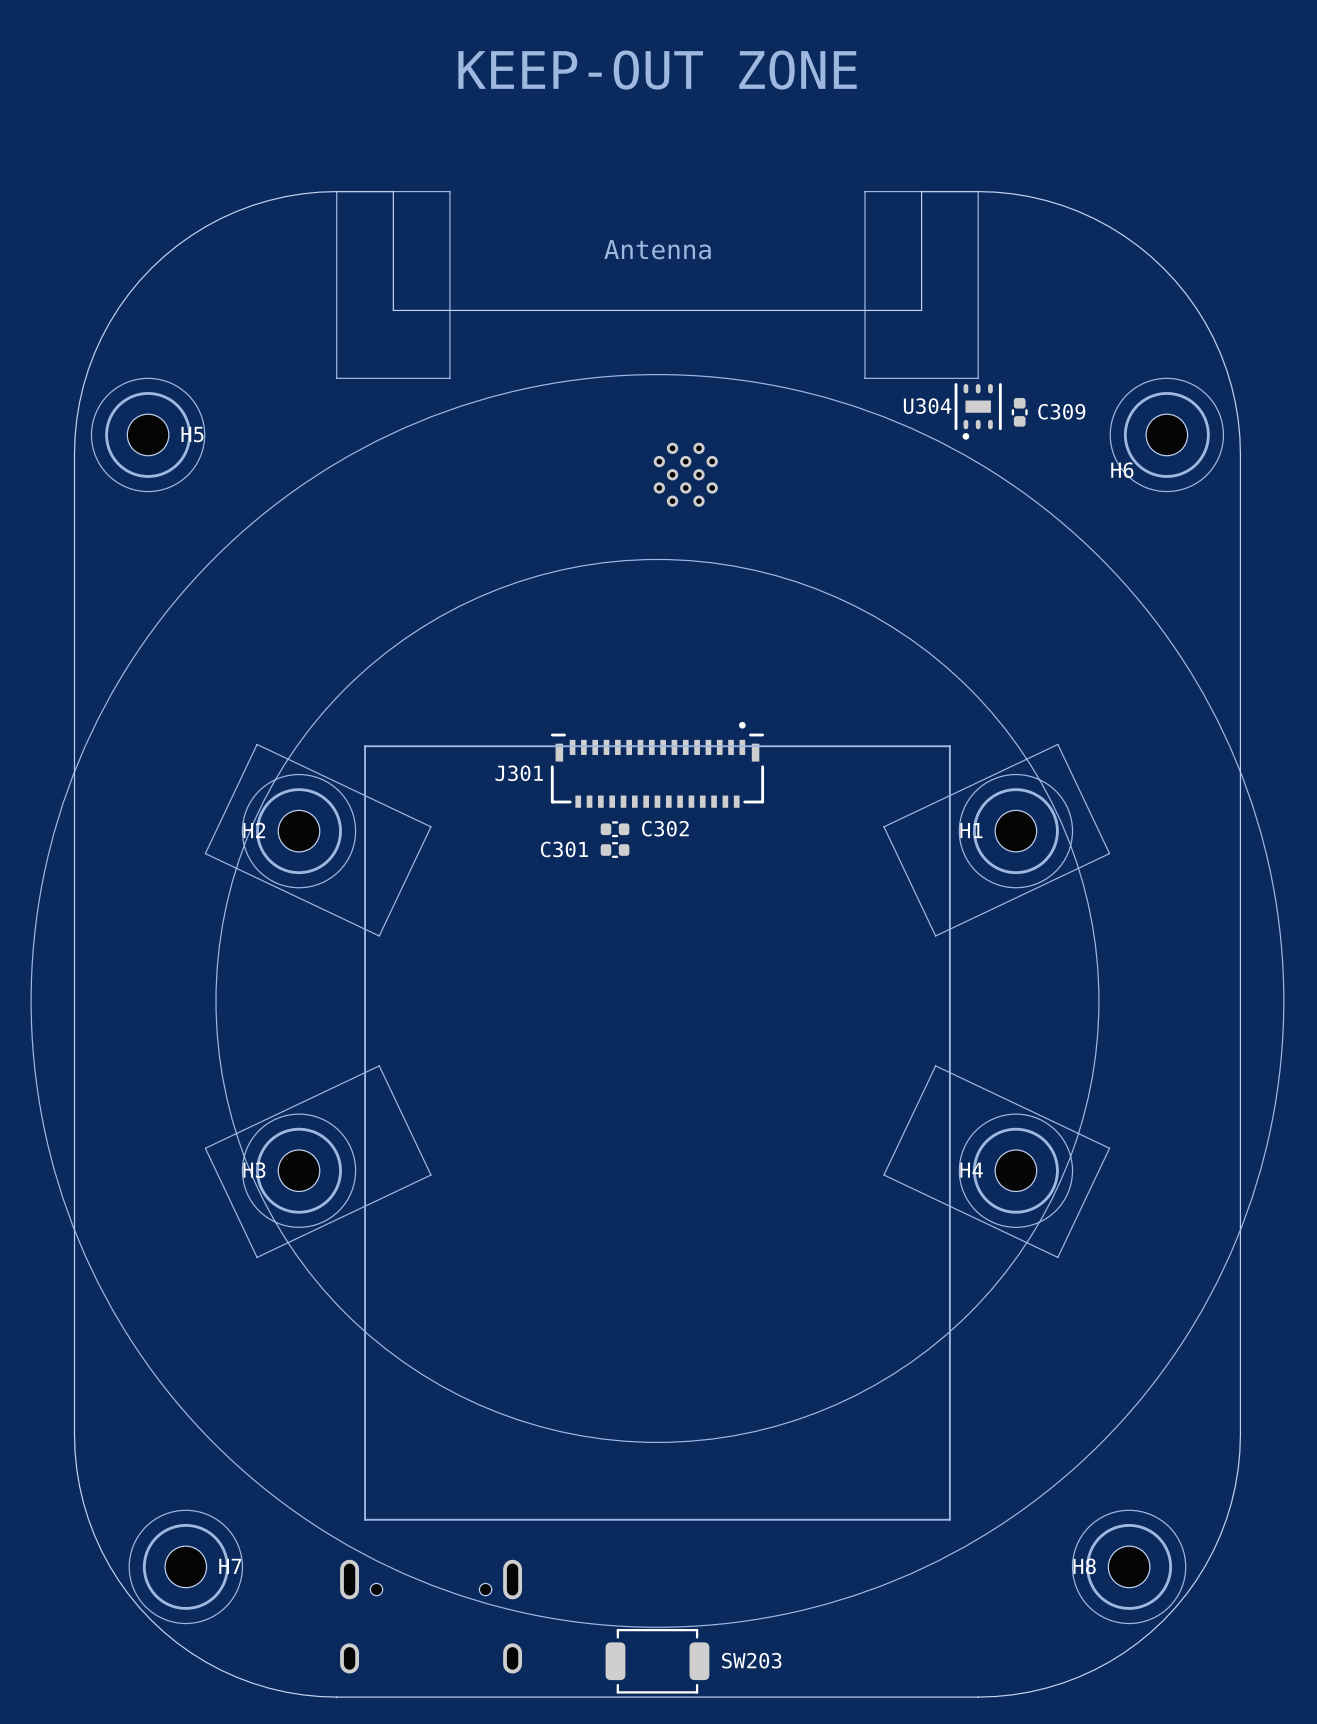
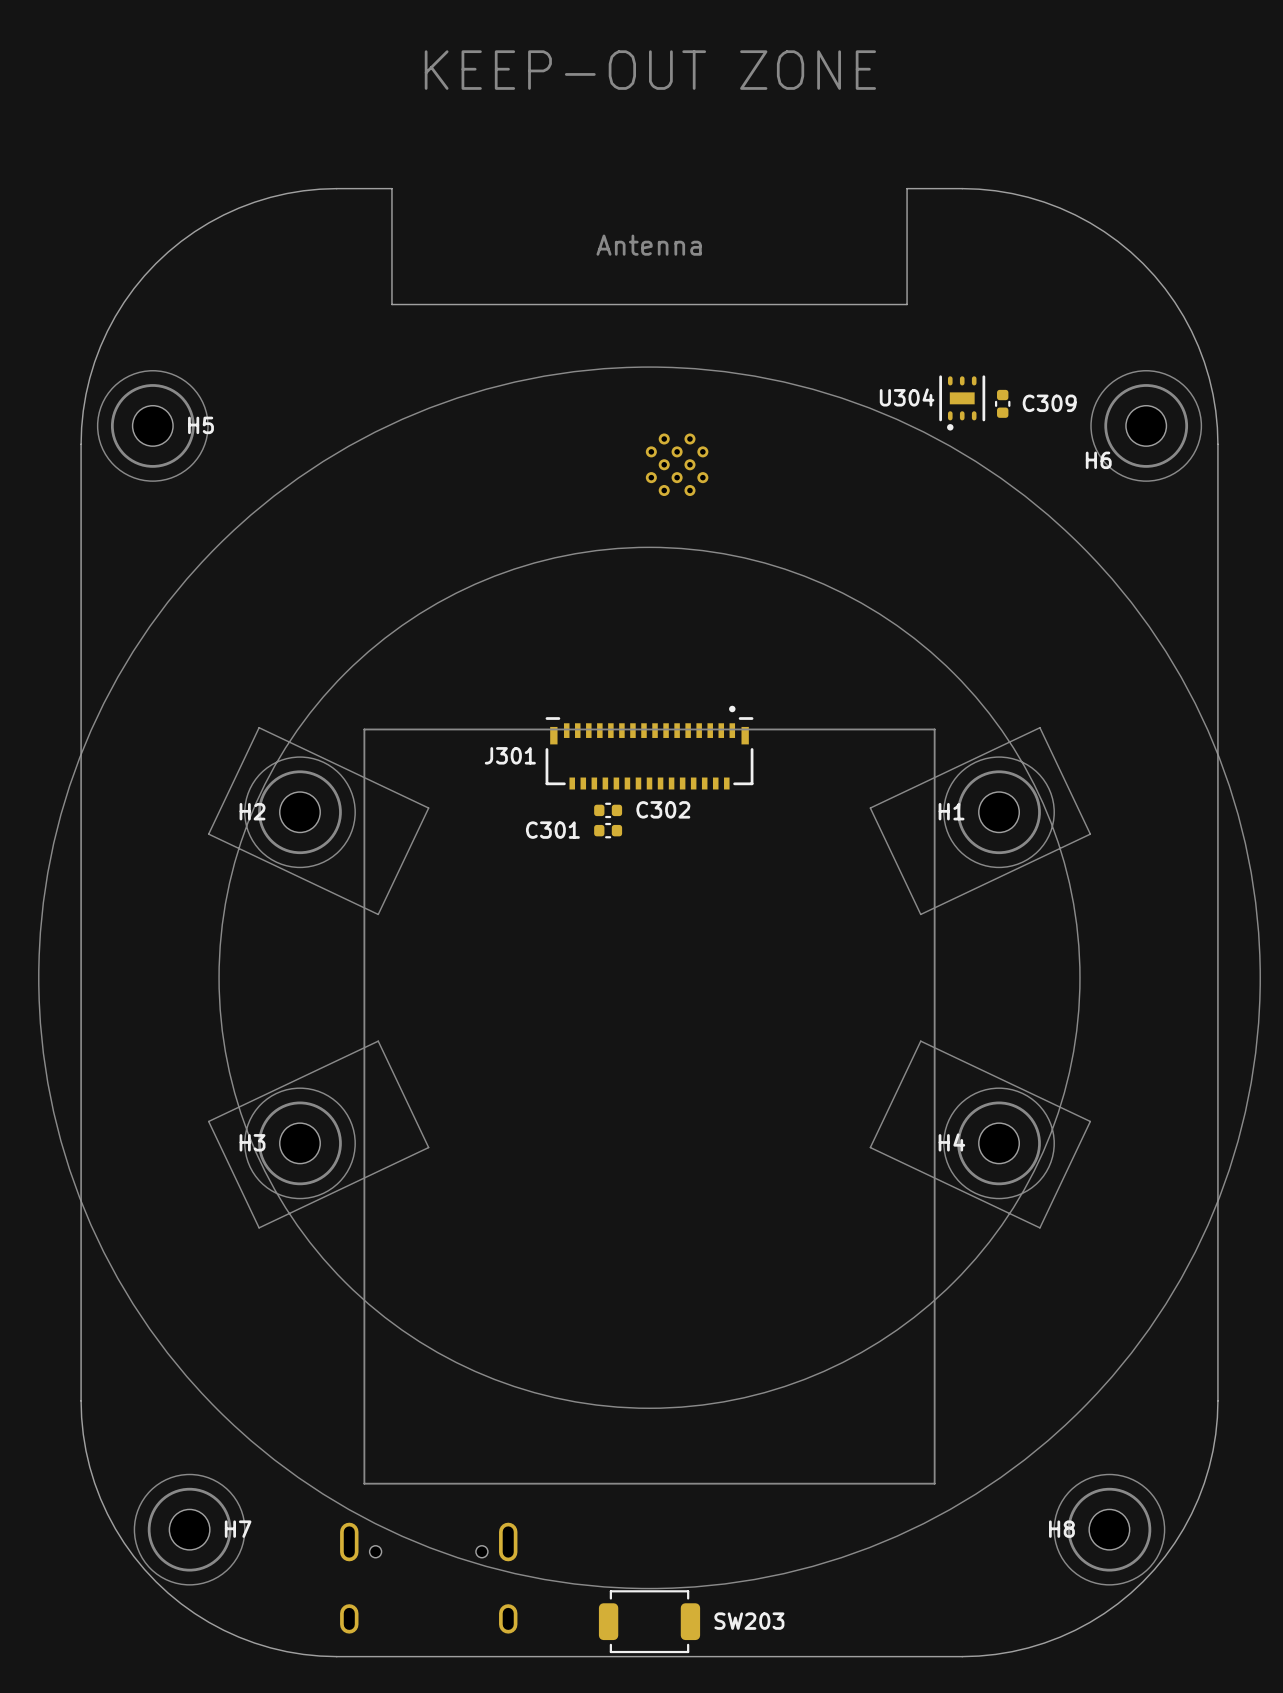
line: (336, 191) (449, 191) (449, 378) (336, 378) (336, 191) -> none
line: (864, 191) (978, 191) (978, 378) (864, 378) (864, 191) -> none

